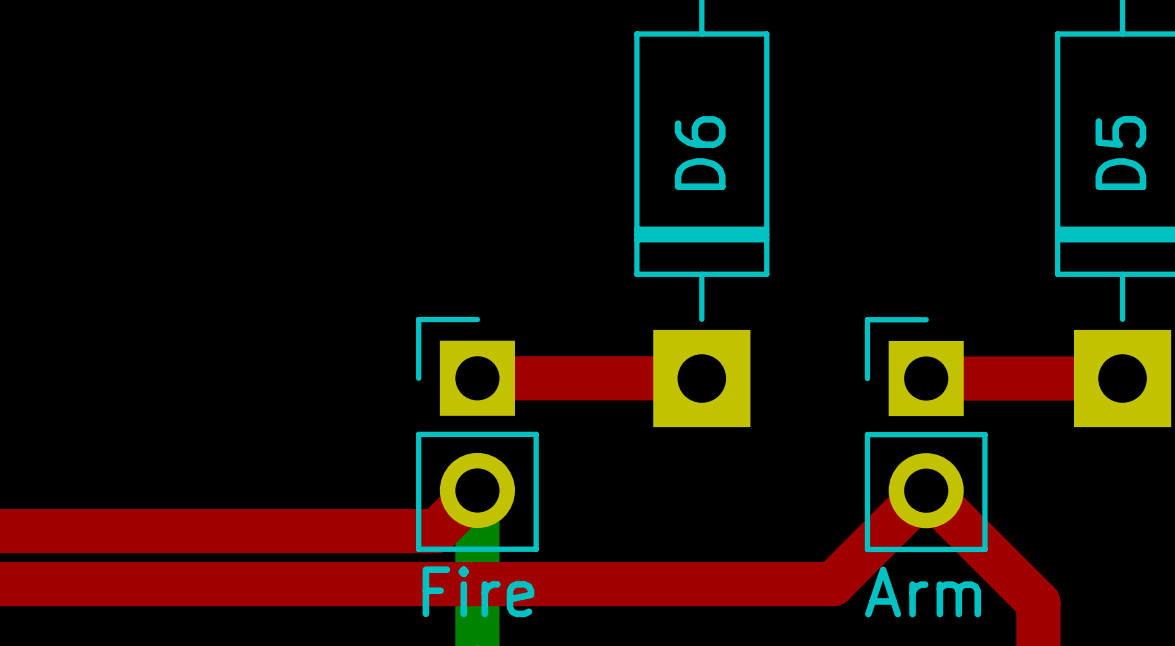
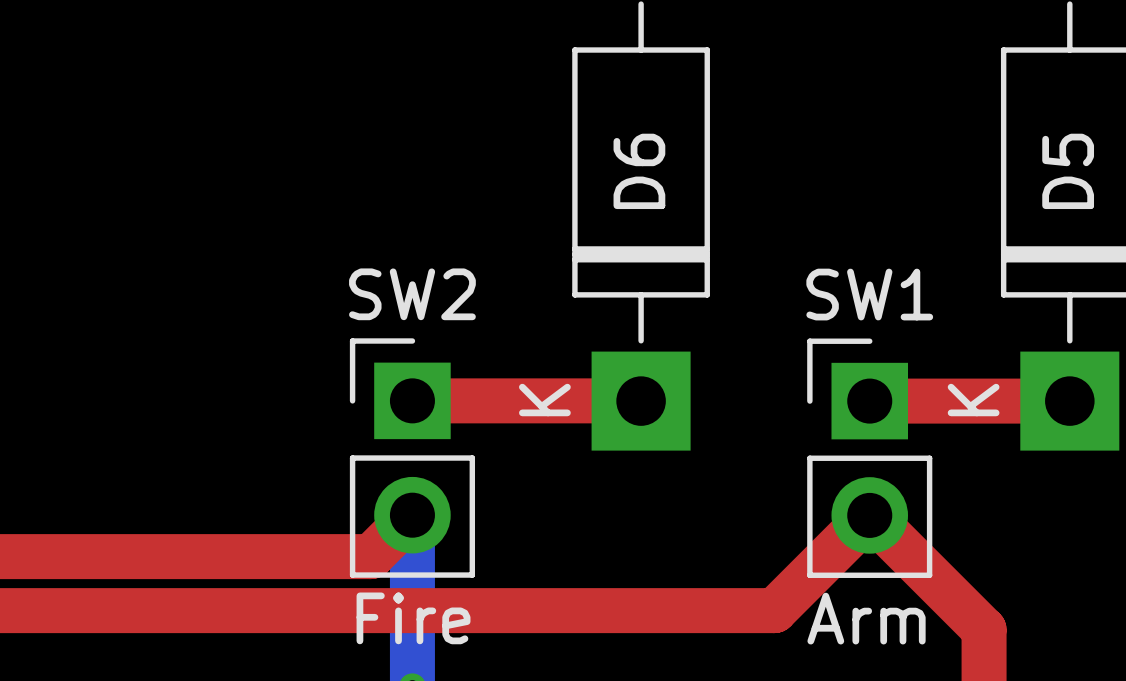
SW2 name: none -> SW2 (412, 294)
SW1 name: none -> SW1 (869, 294)
D6 text: none -> K (544, 400)
D5 text: none -> K (973, 400)

